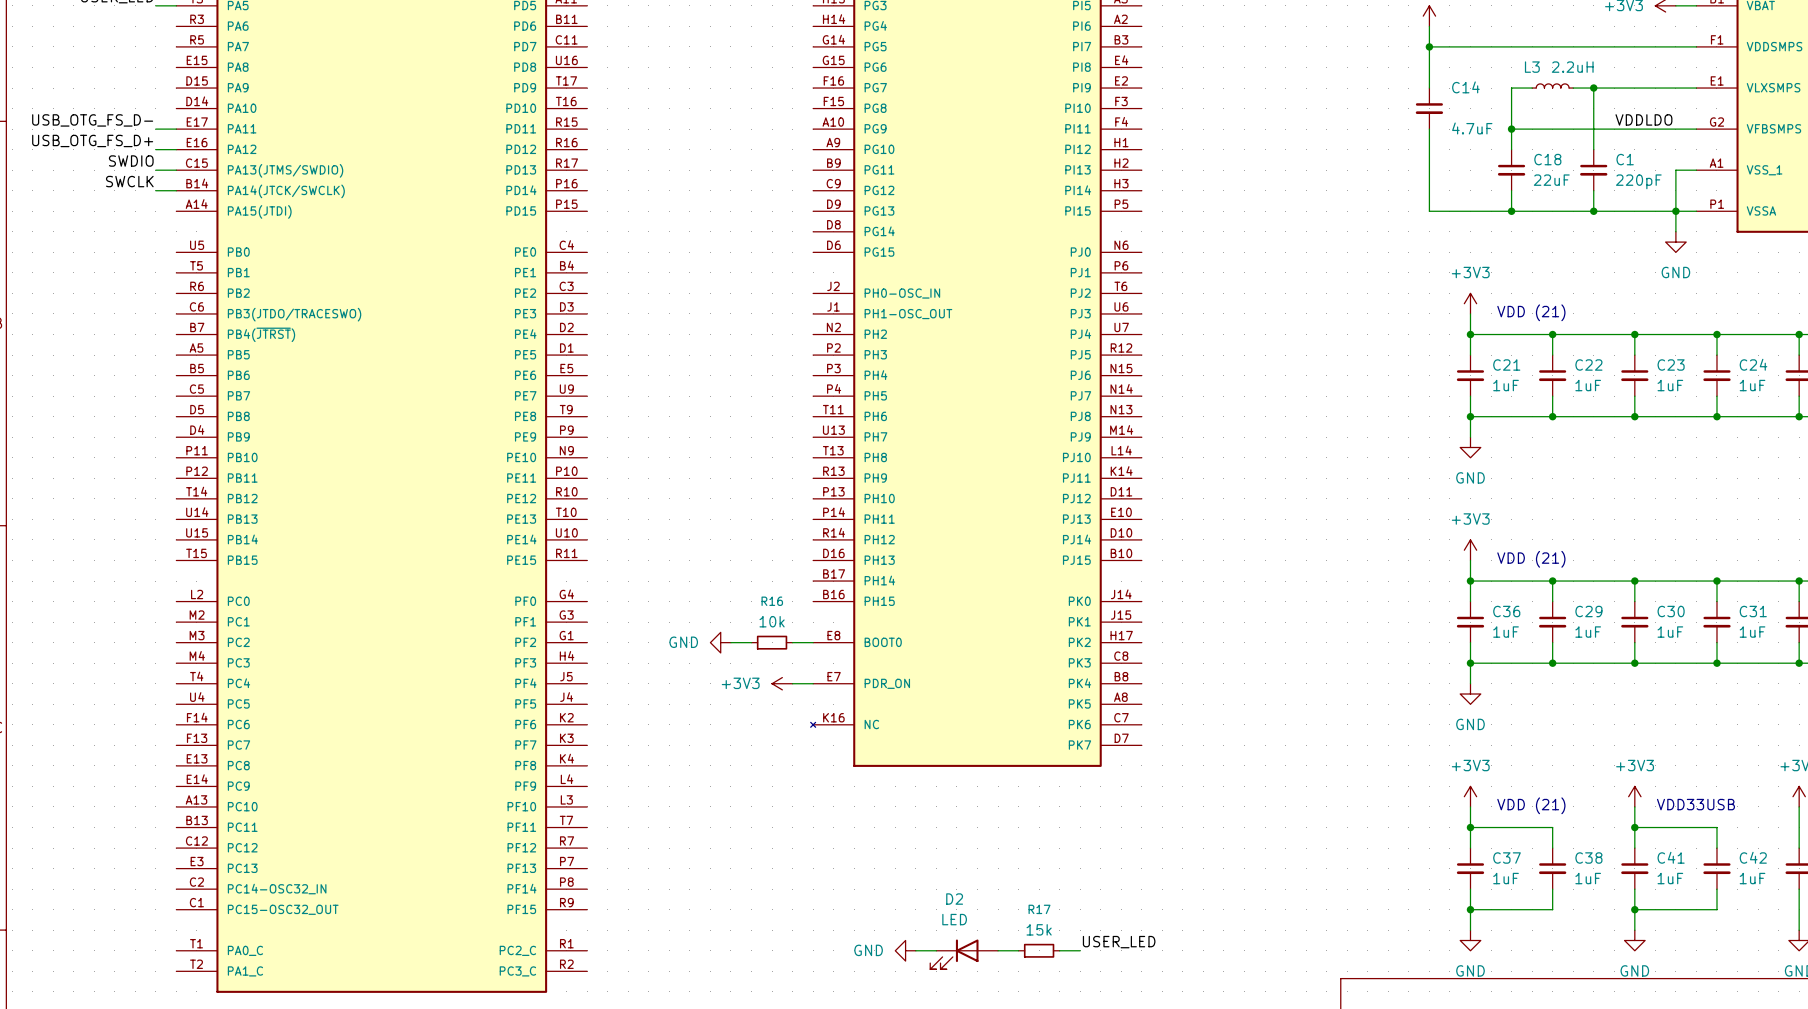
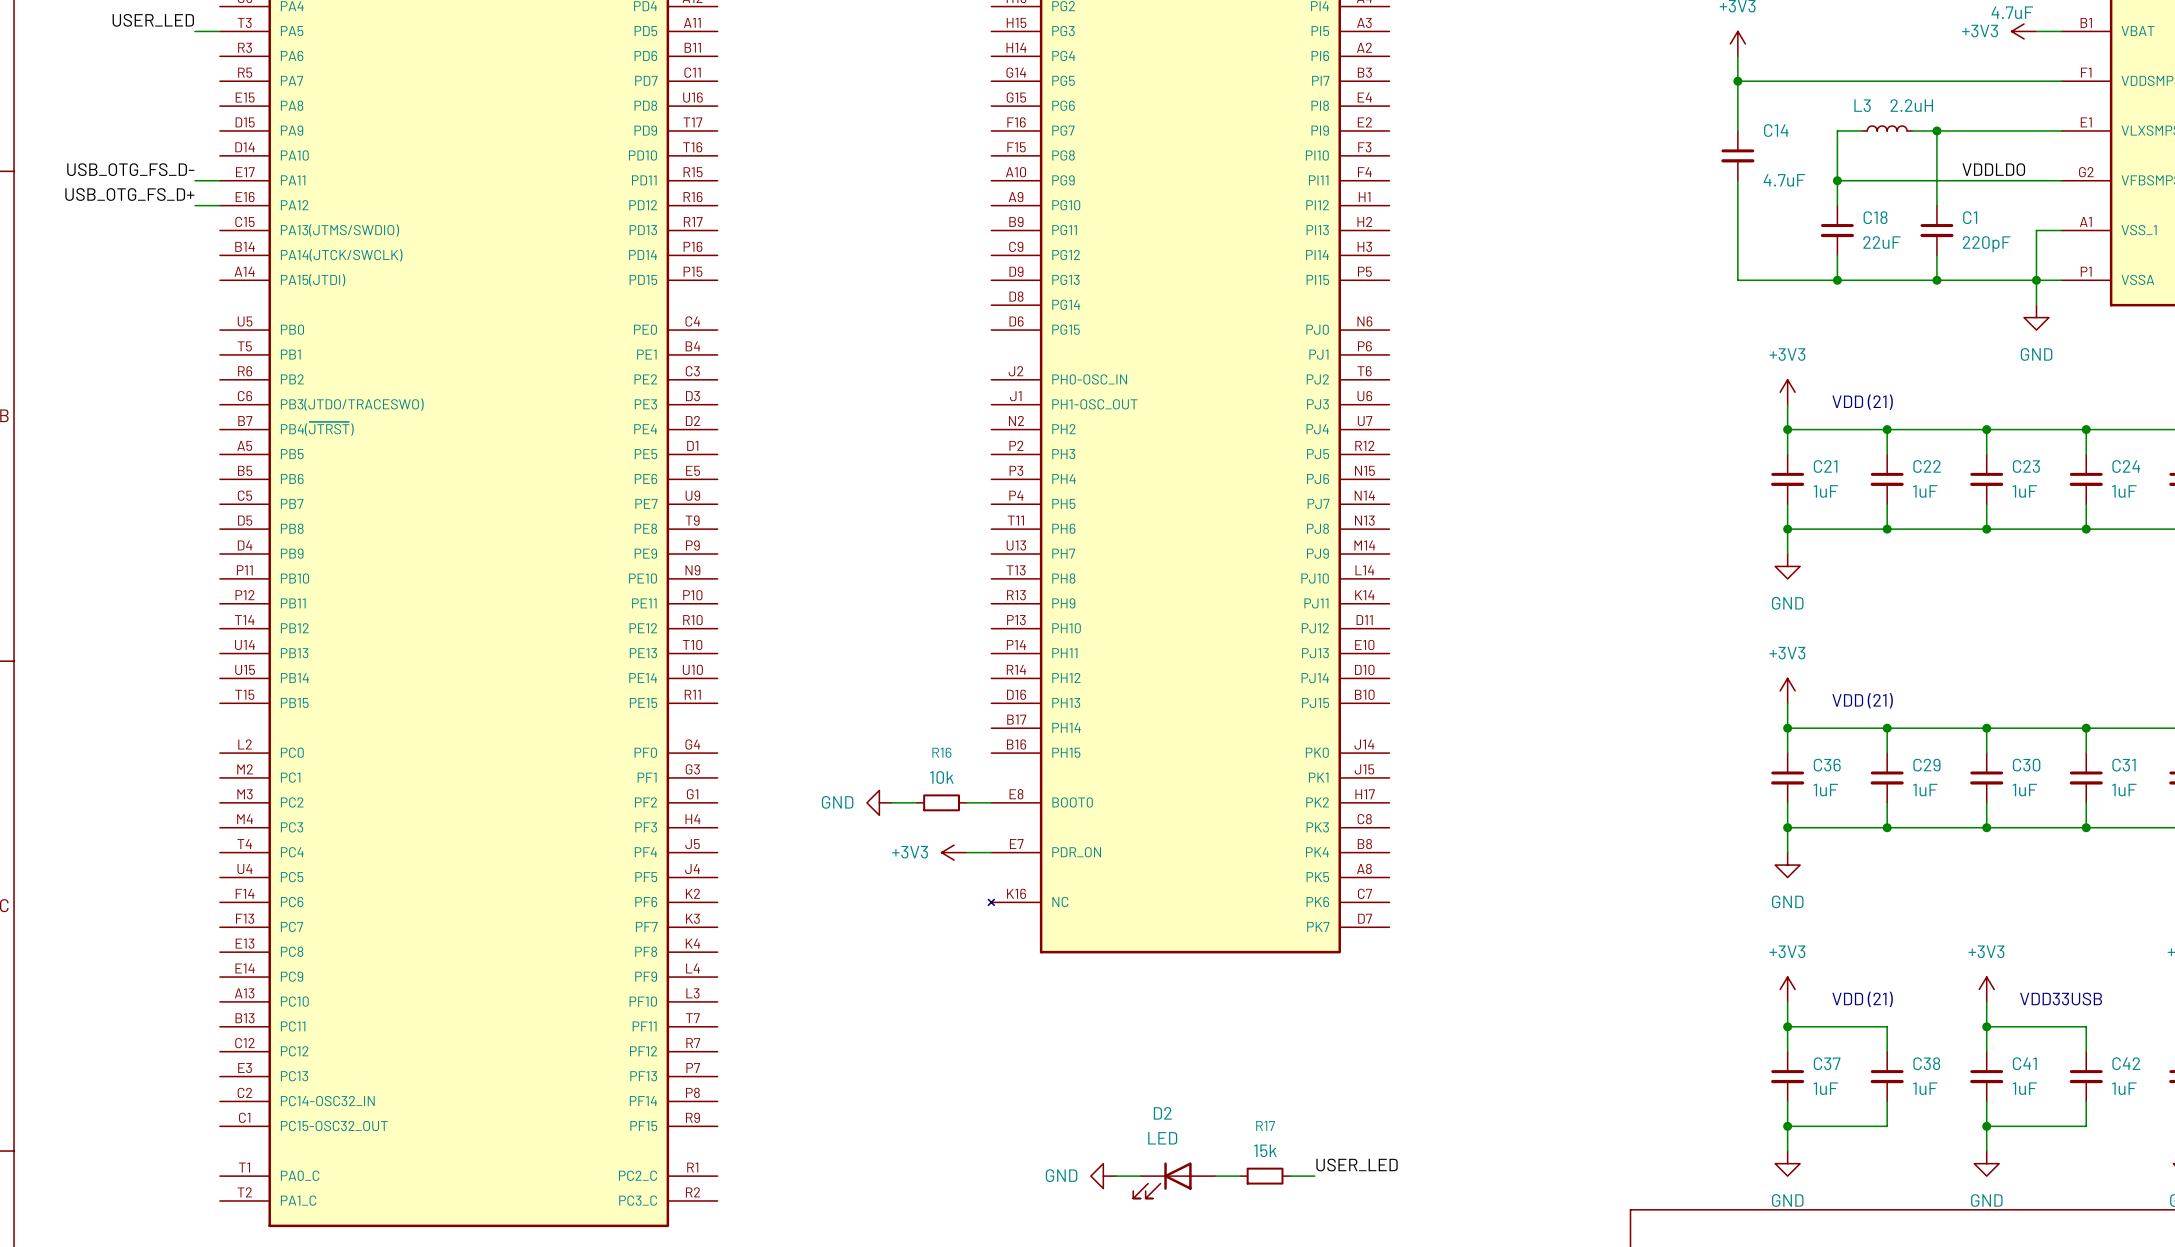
label: SWDIO (131, 161) -> none
wire: (155, 170) (176, 170) -> none
label: SWCLK (129, 181) -> none
wire: (155, 190) (176, 190) -> none

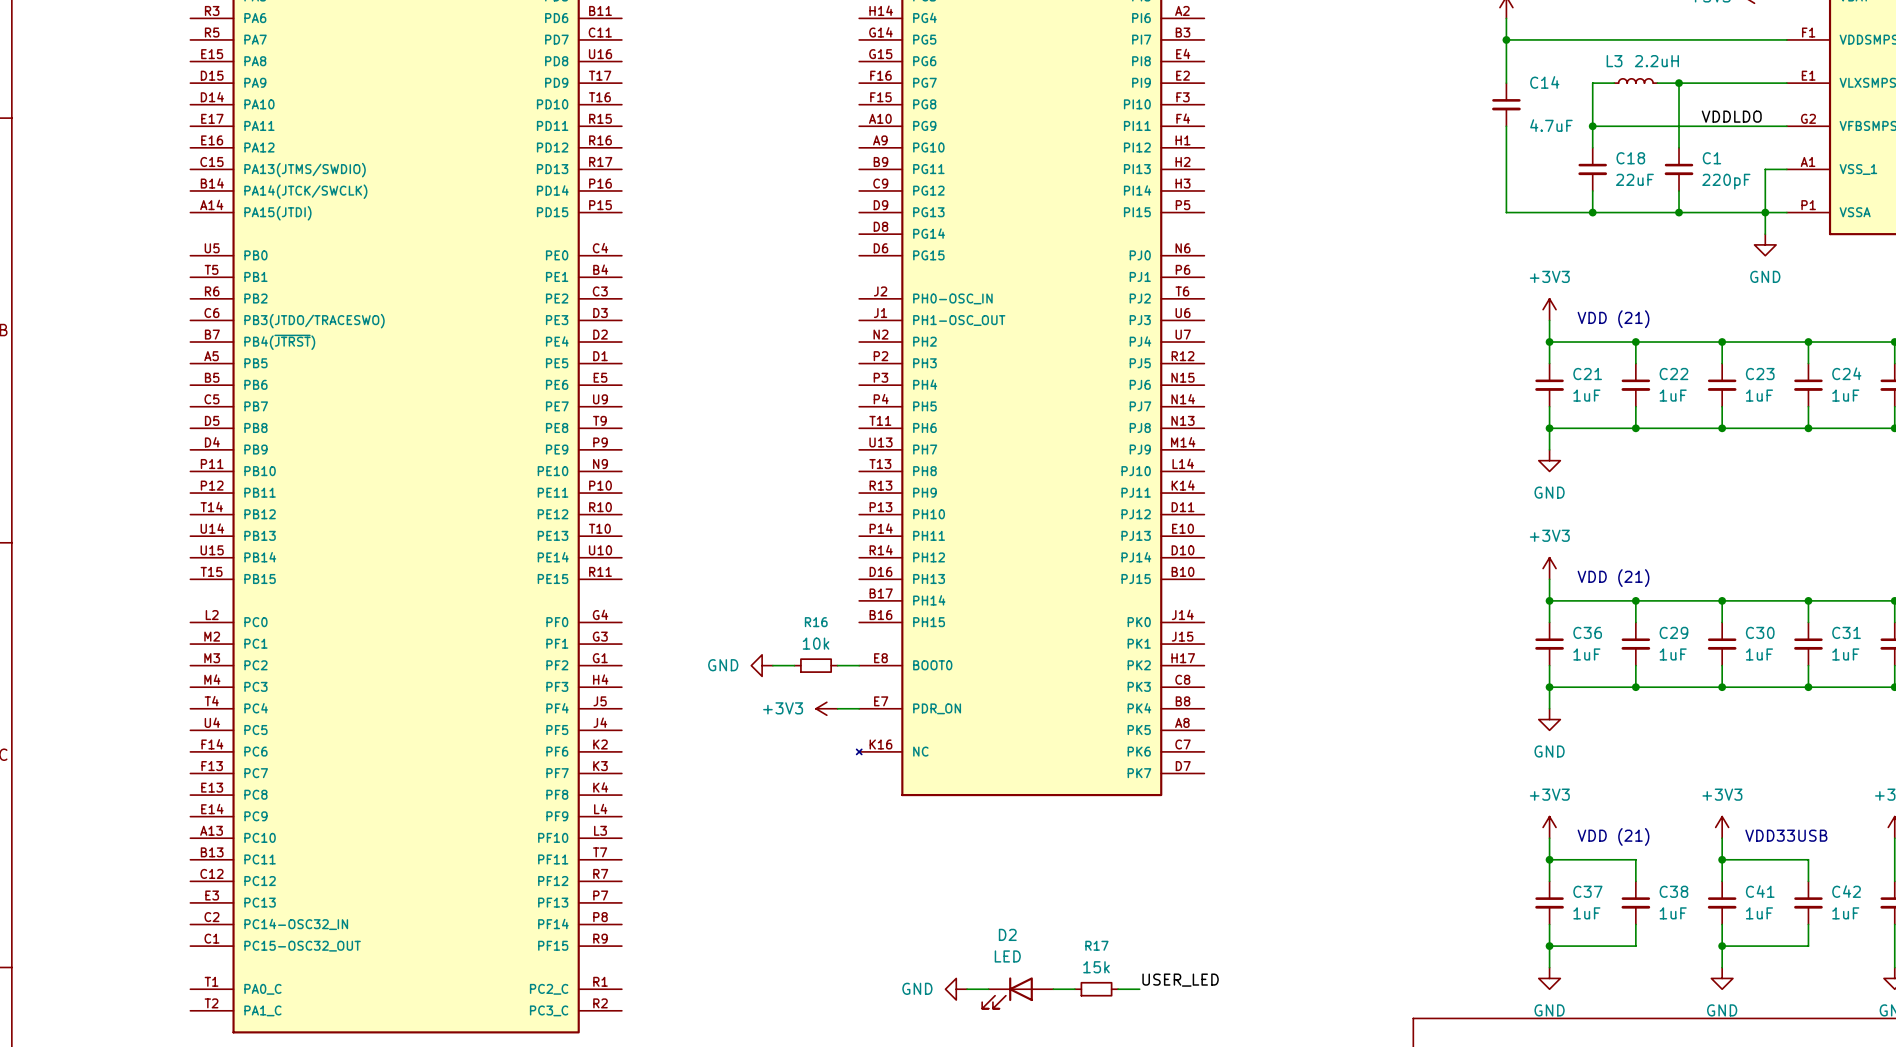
label: USB_OTG_FS_D- (130, 169) -> none
wire: (195, 180) (219, 180) -> none
label: USB_OTG_FS_D+ (129, 194) -> none
wire: (195, 205) (219, 205) -> none

